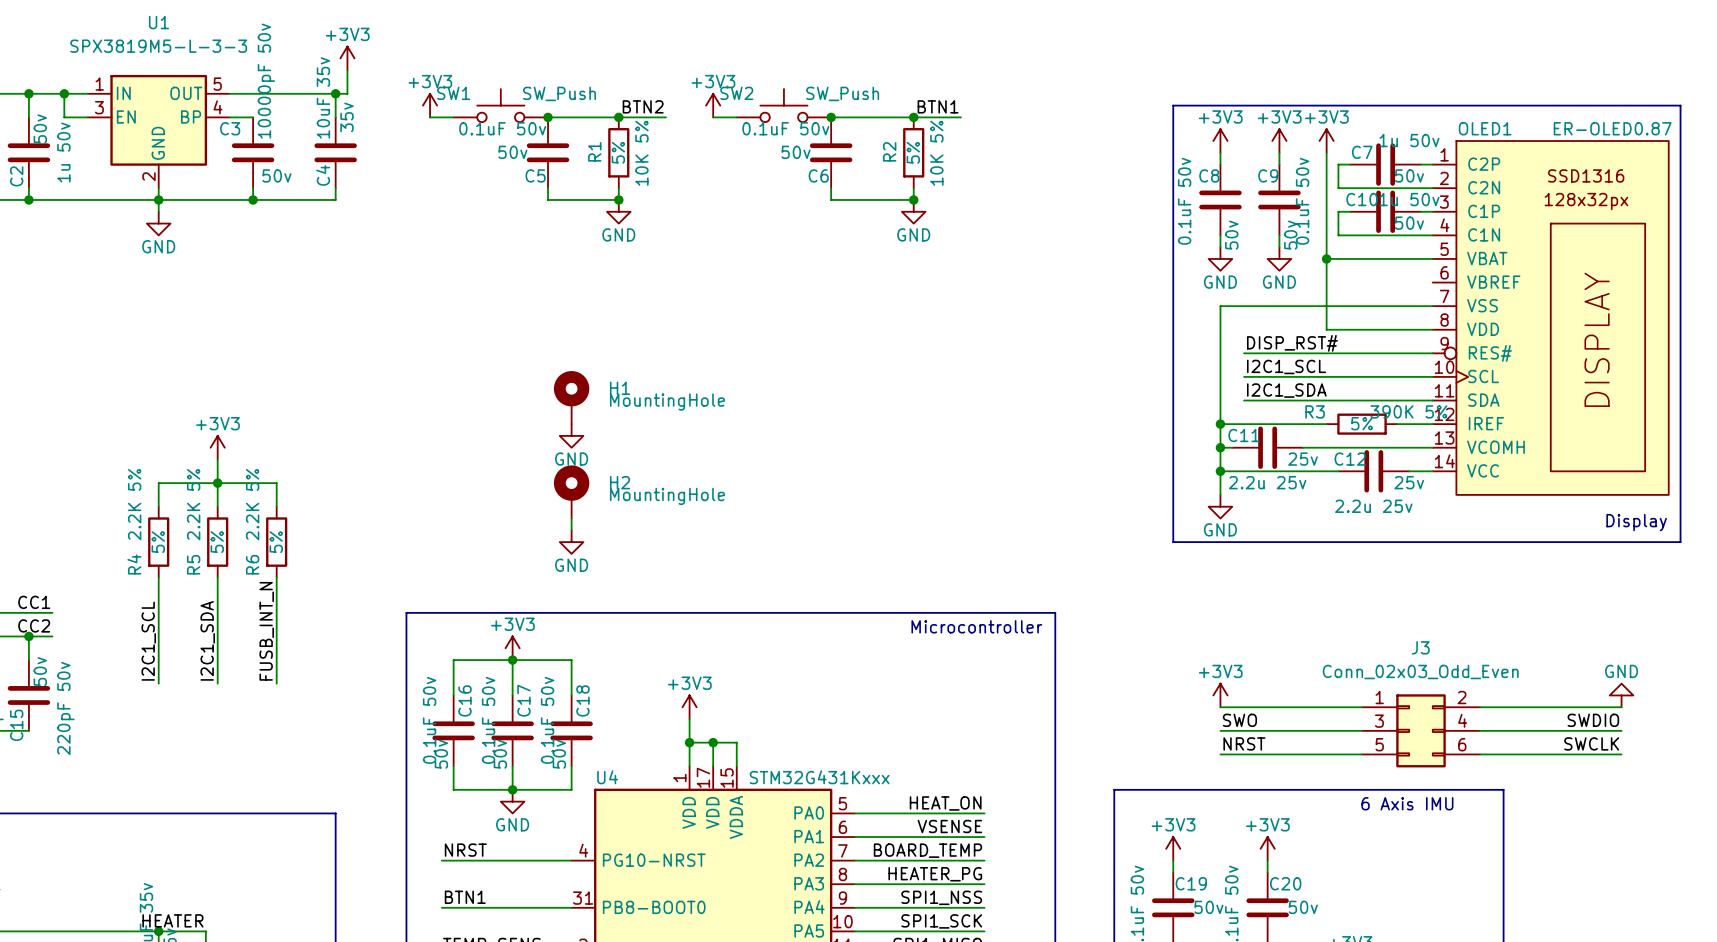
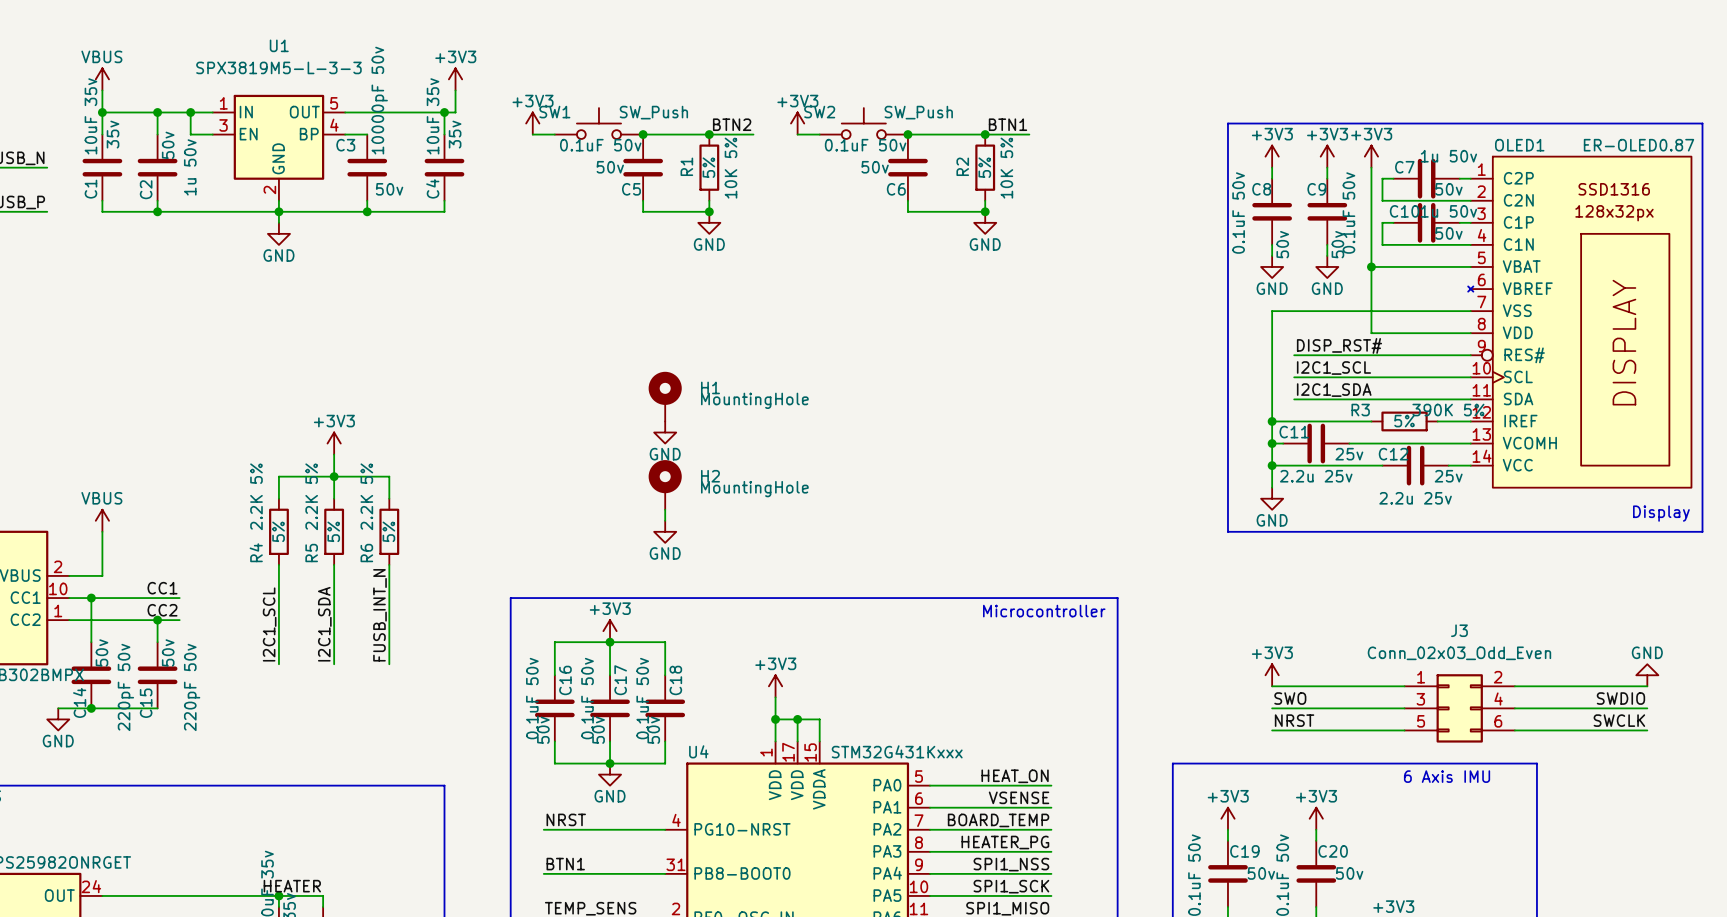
OLED1 symbol: [1432, 140, 1669, 495] -> [1468, 156, 1692, 488]

